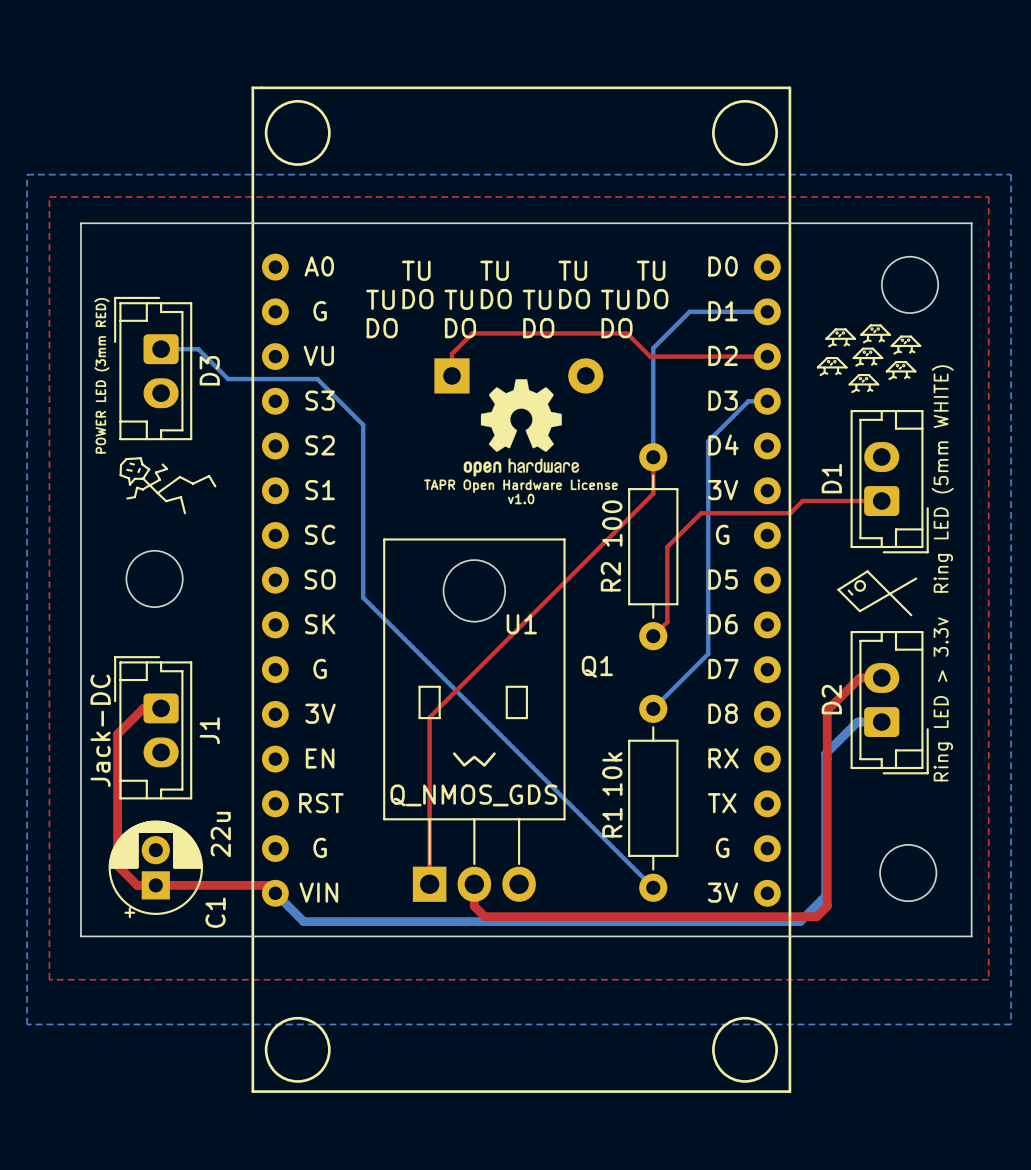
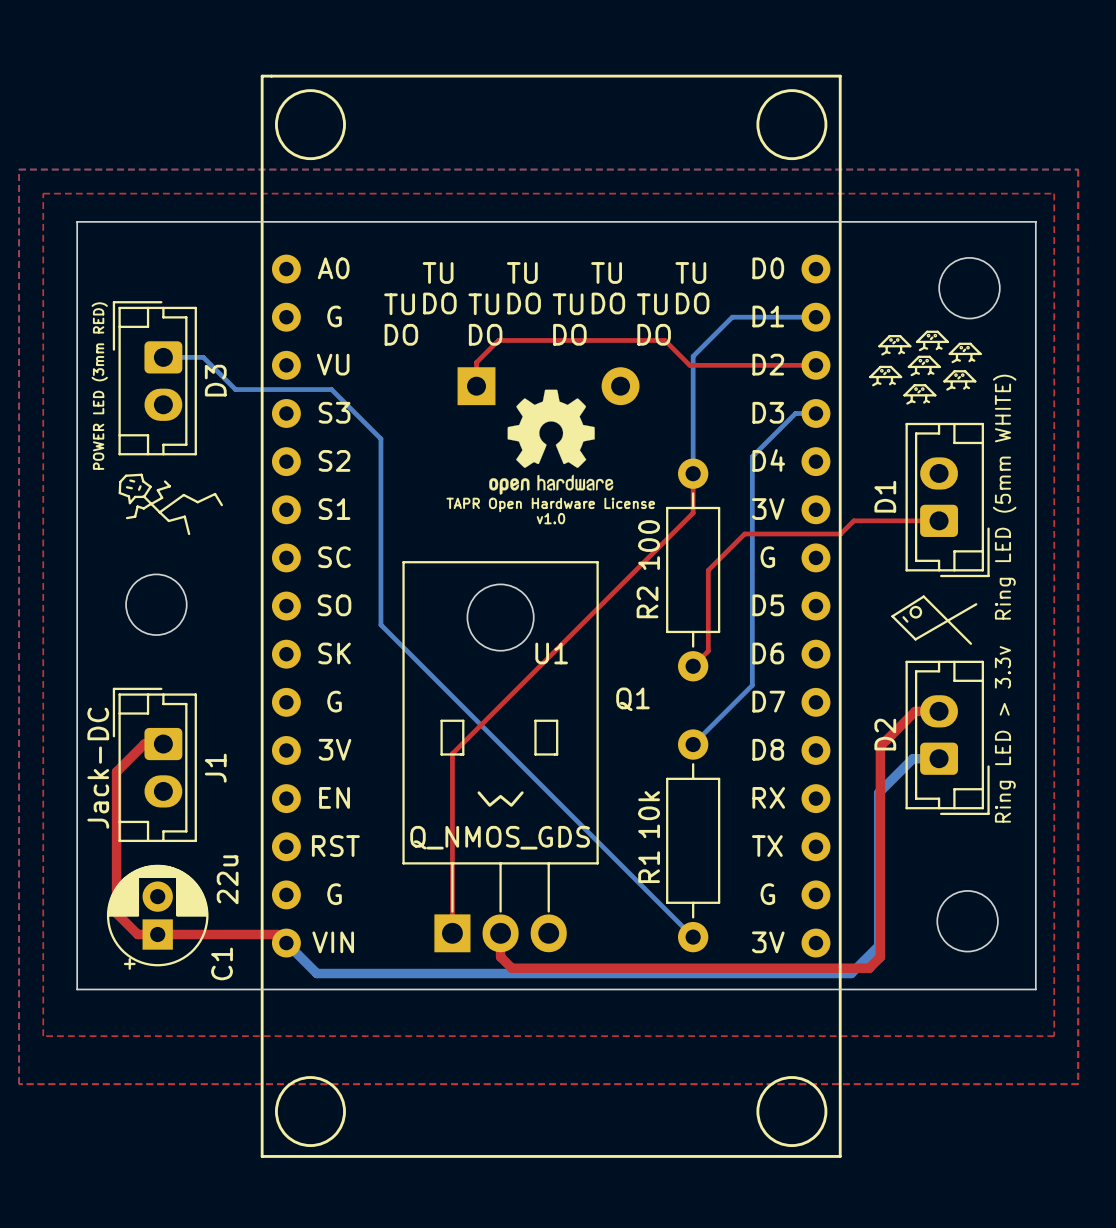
top zone outline: none -> (19, 169) (19, 1084) (1078, 1084) (1078, 169) (19, 169)

